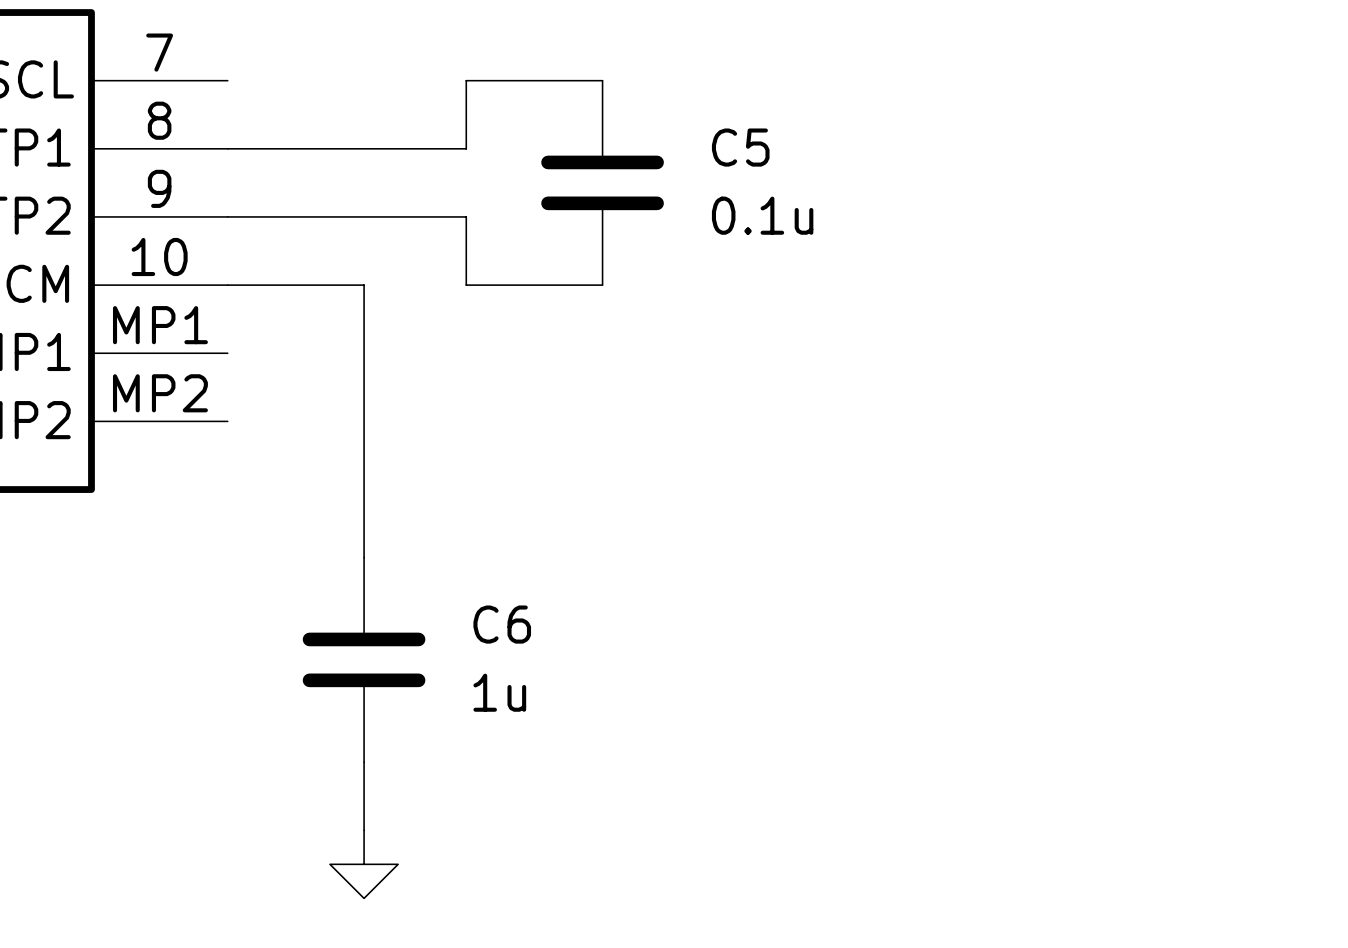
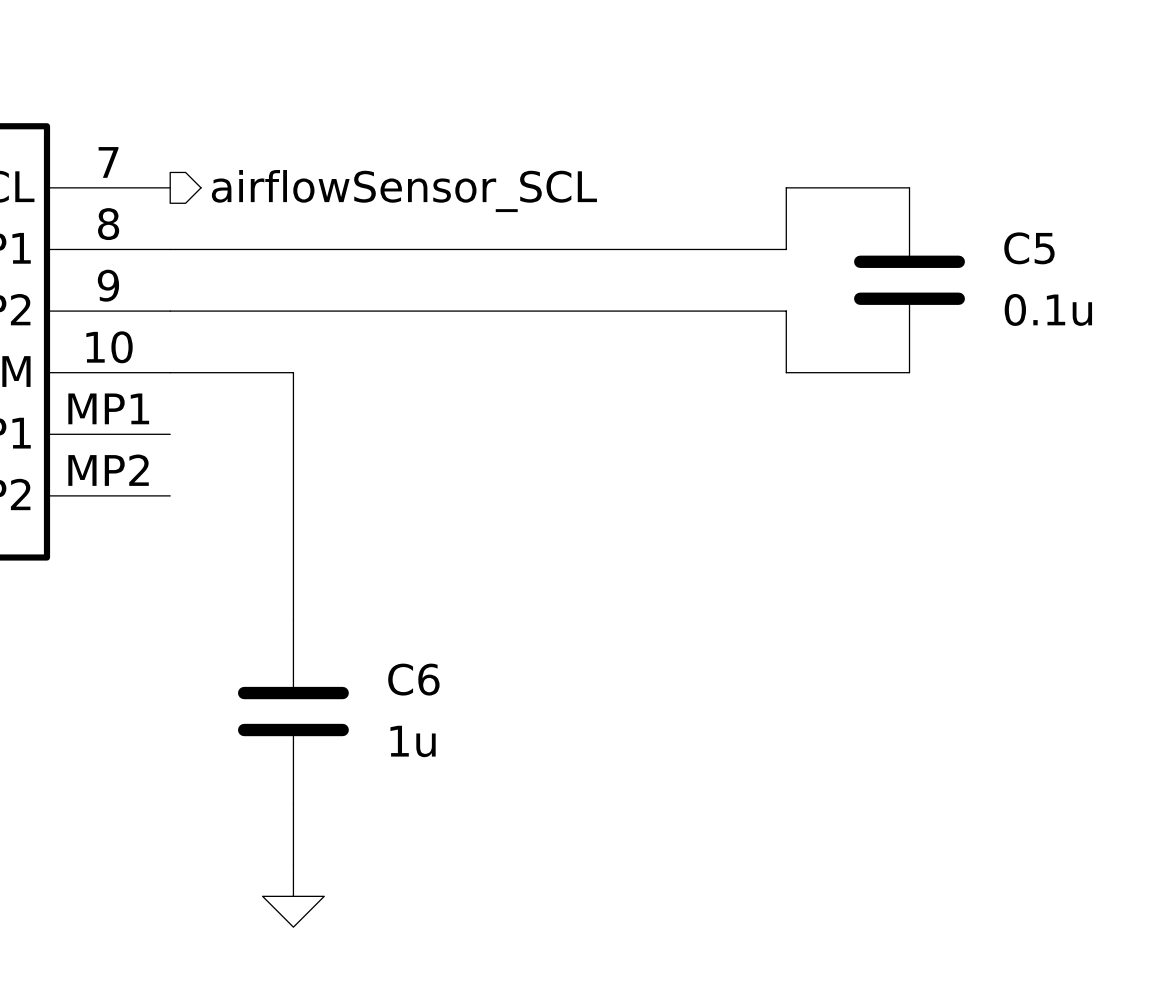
wire: (602, 80) (466, 80) (466, 148) -> (909, 187) (786, 187) (786, 249) (385, 249)
hierarchical label: none -> airflowSensor_SCL (404, 191)
C5 position: (602, 182) -> (909, 280)
wire: (466, 216) (466, 285) (602, 285) -> (385, 311) (786, 311) (786, 372) (909, 372)

